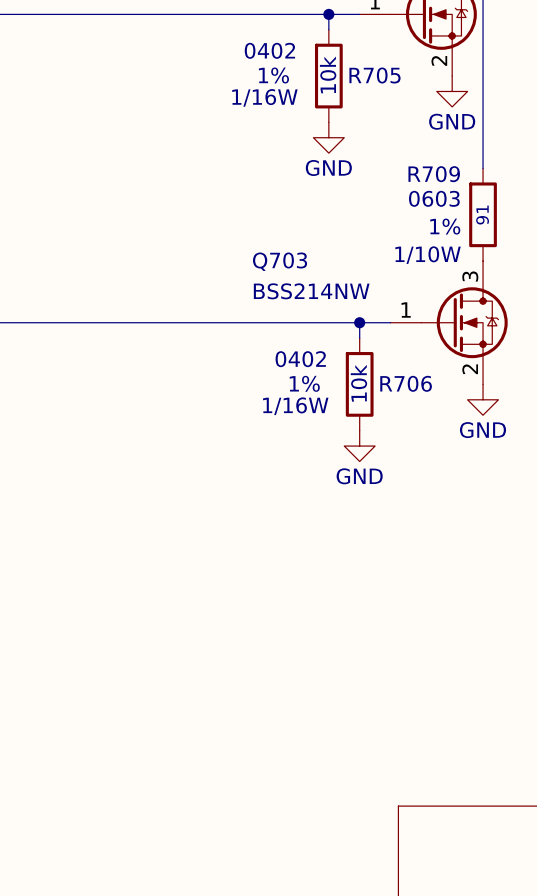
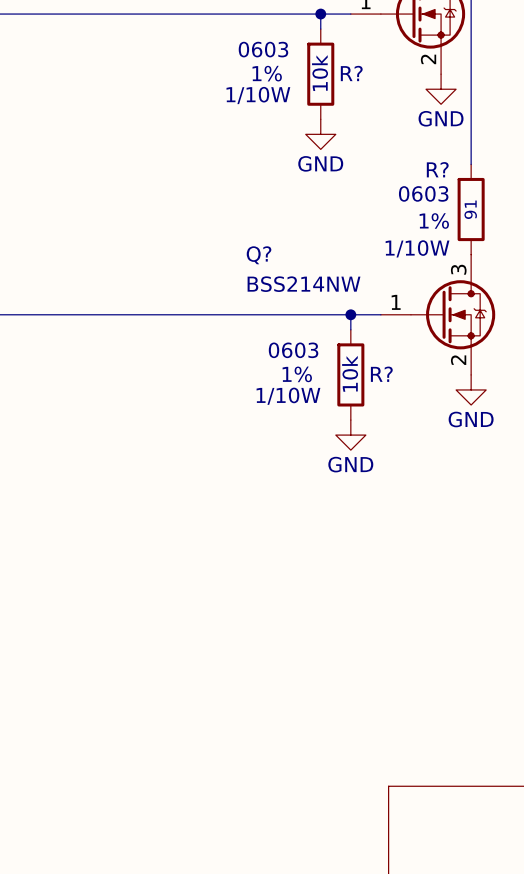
R705 text: 0402 (269, 50) -> 0603 (263, 49)
R705 name: R705 (375, 75) -> R? (351, 73)
R705 text: 1/16W (264, 97) -> 1/10W (258, 95)
R709 name: R709 (434, 174) -> R? (437, 169)
Q703 name: Q703 (280, 261) -> Q? (259, 255)
R706 text: 0402 (300, 359) -> 0603 (293, 350)
R706 name: R706 (406, 383) -> R? (381, 374)
R706 text: 1/16W (295, 406) -> 1/10W (288, 396)

